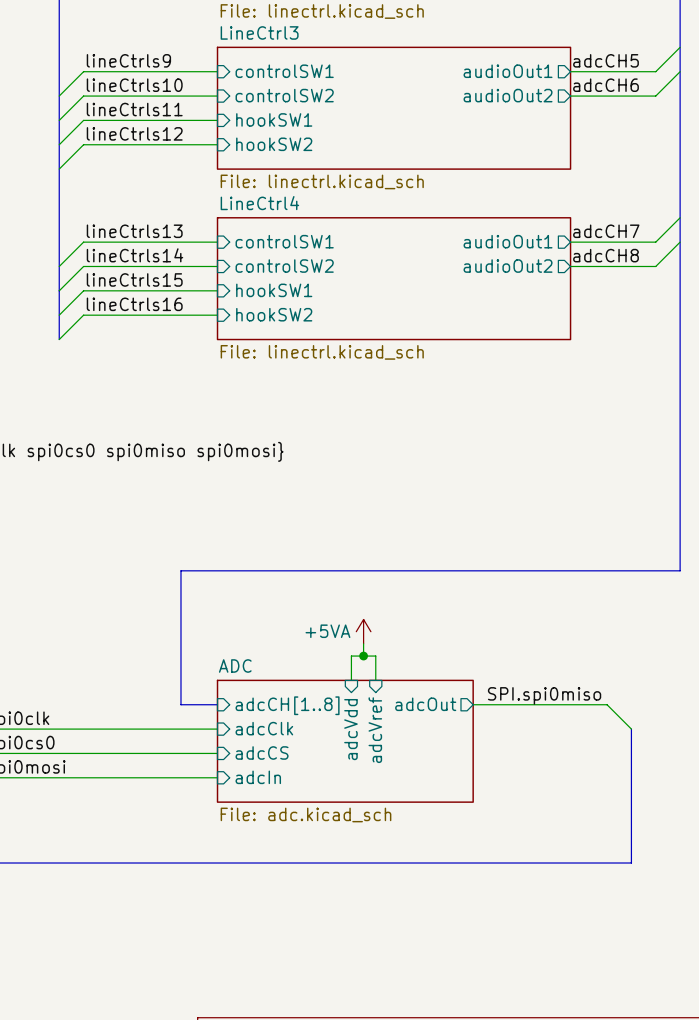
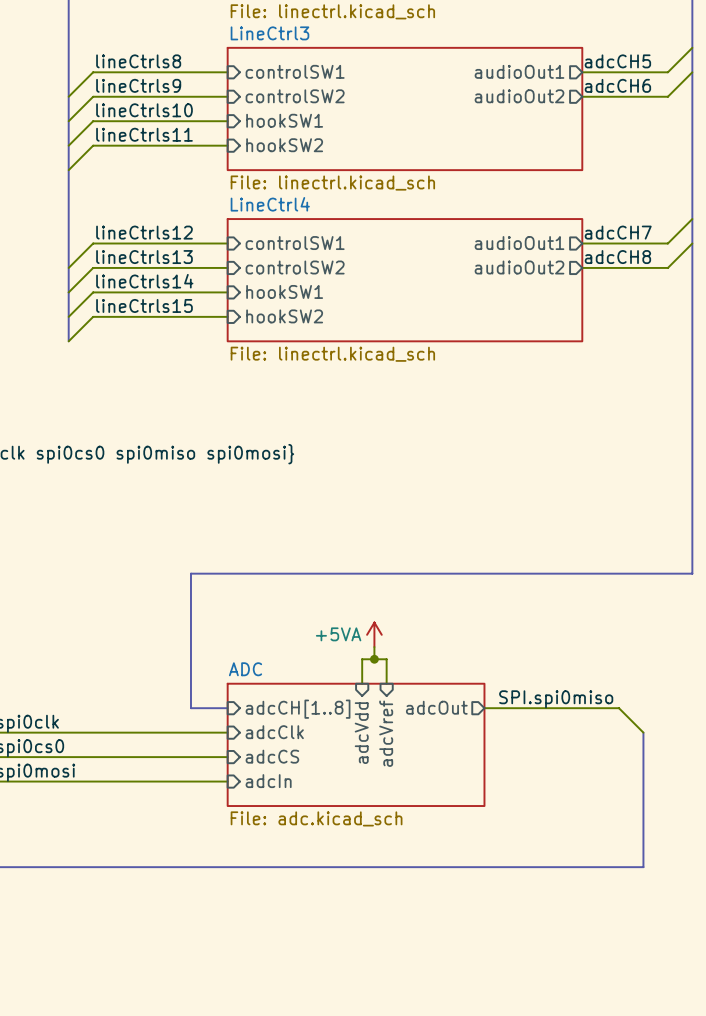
label: lineCtrls9 (128, 60) -> lineCtrls8 (138, 61)
label: lineCtrls10 (134, 85) -> lineCtrls9 (138, 85)
label: lineCtrls11 (134, 109) -> lineCtrls10 (144, 110)
label: lineCtrls12 (134, 133) -> lineCtrls11 (144, 134)
label: lineCtrls13 (134, 231) -> lineCtrls12 (144, 232)
label: lineCtrls14 (134, 255) -> lineCtrls13 (144, 257)
label: lineCtrls15 (134, 279) -> lineCtrls14 (144, 281)
label: lineCtrls16 (134, 304) -> lineCtrls15 (144, 305)

